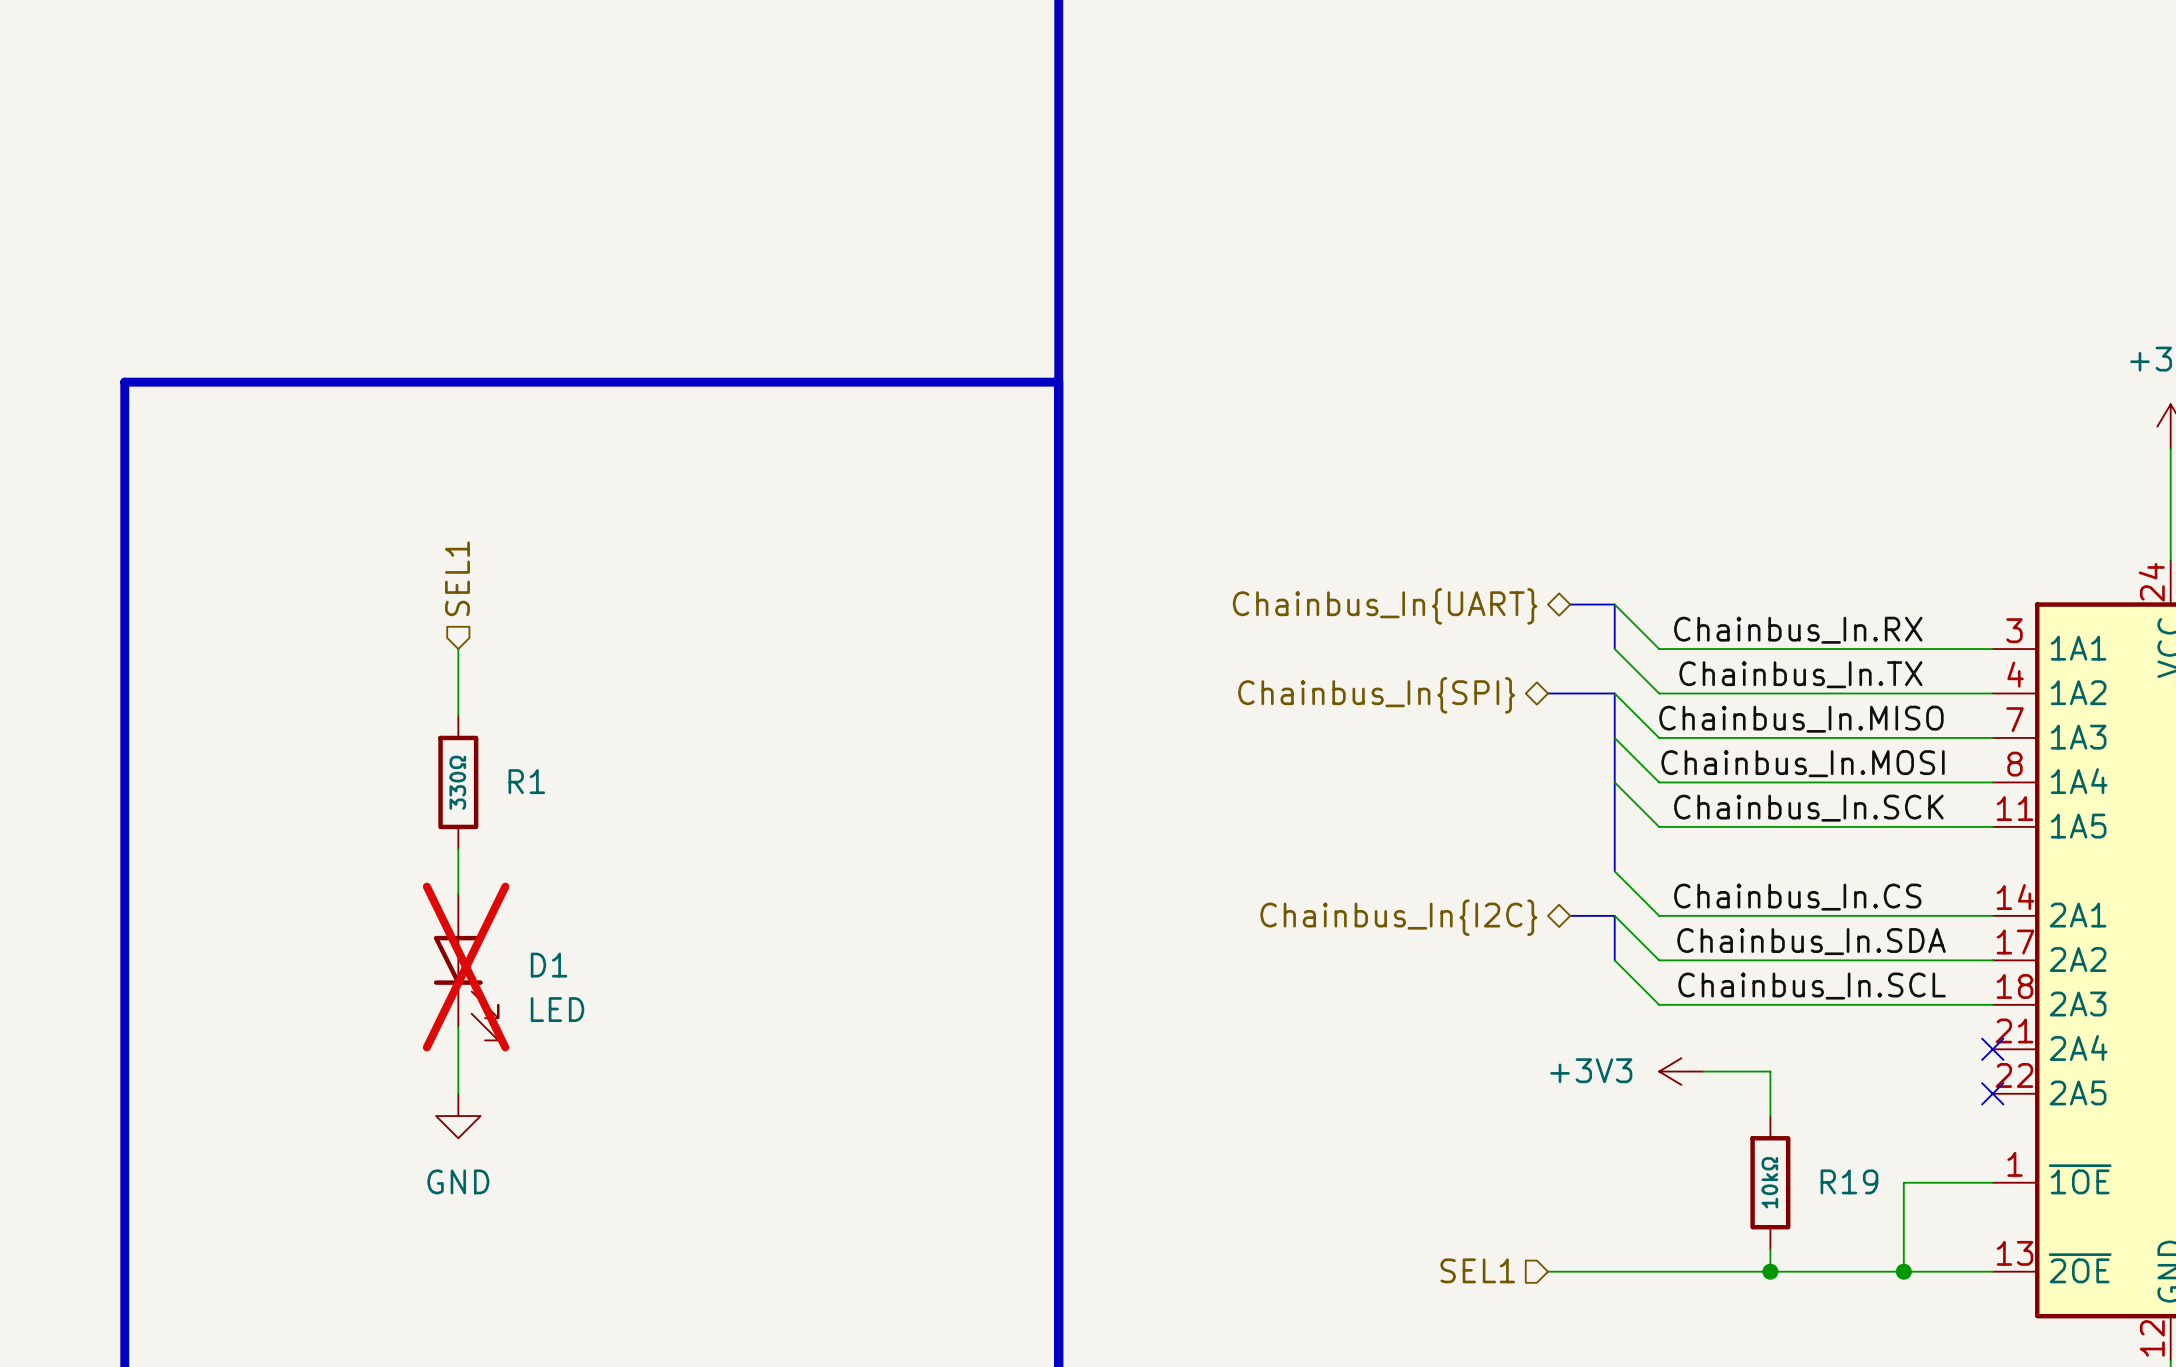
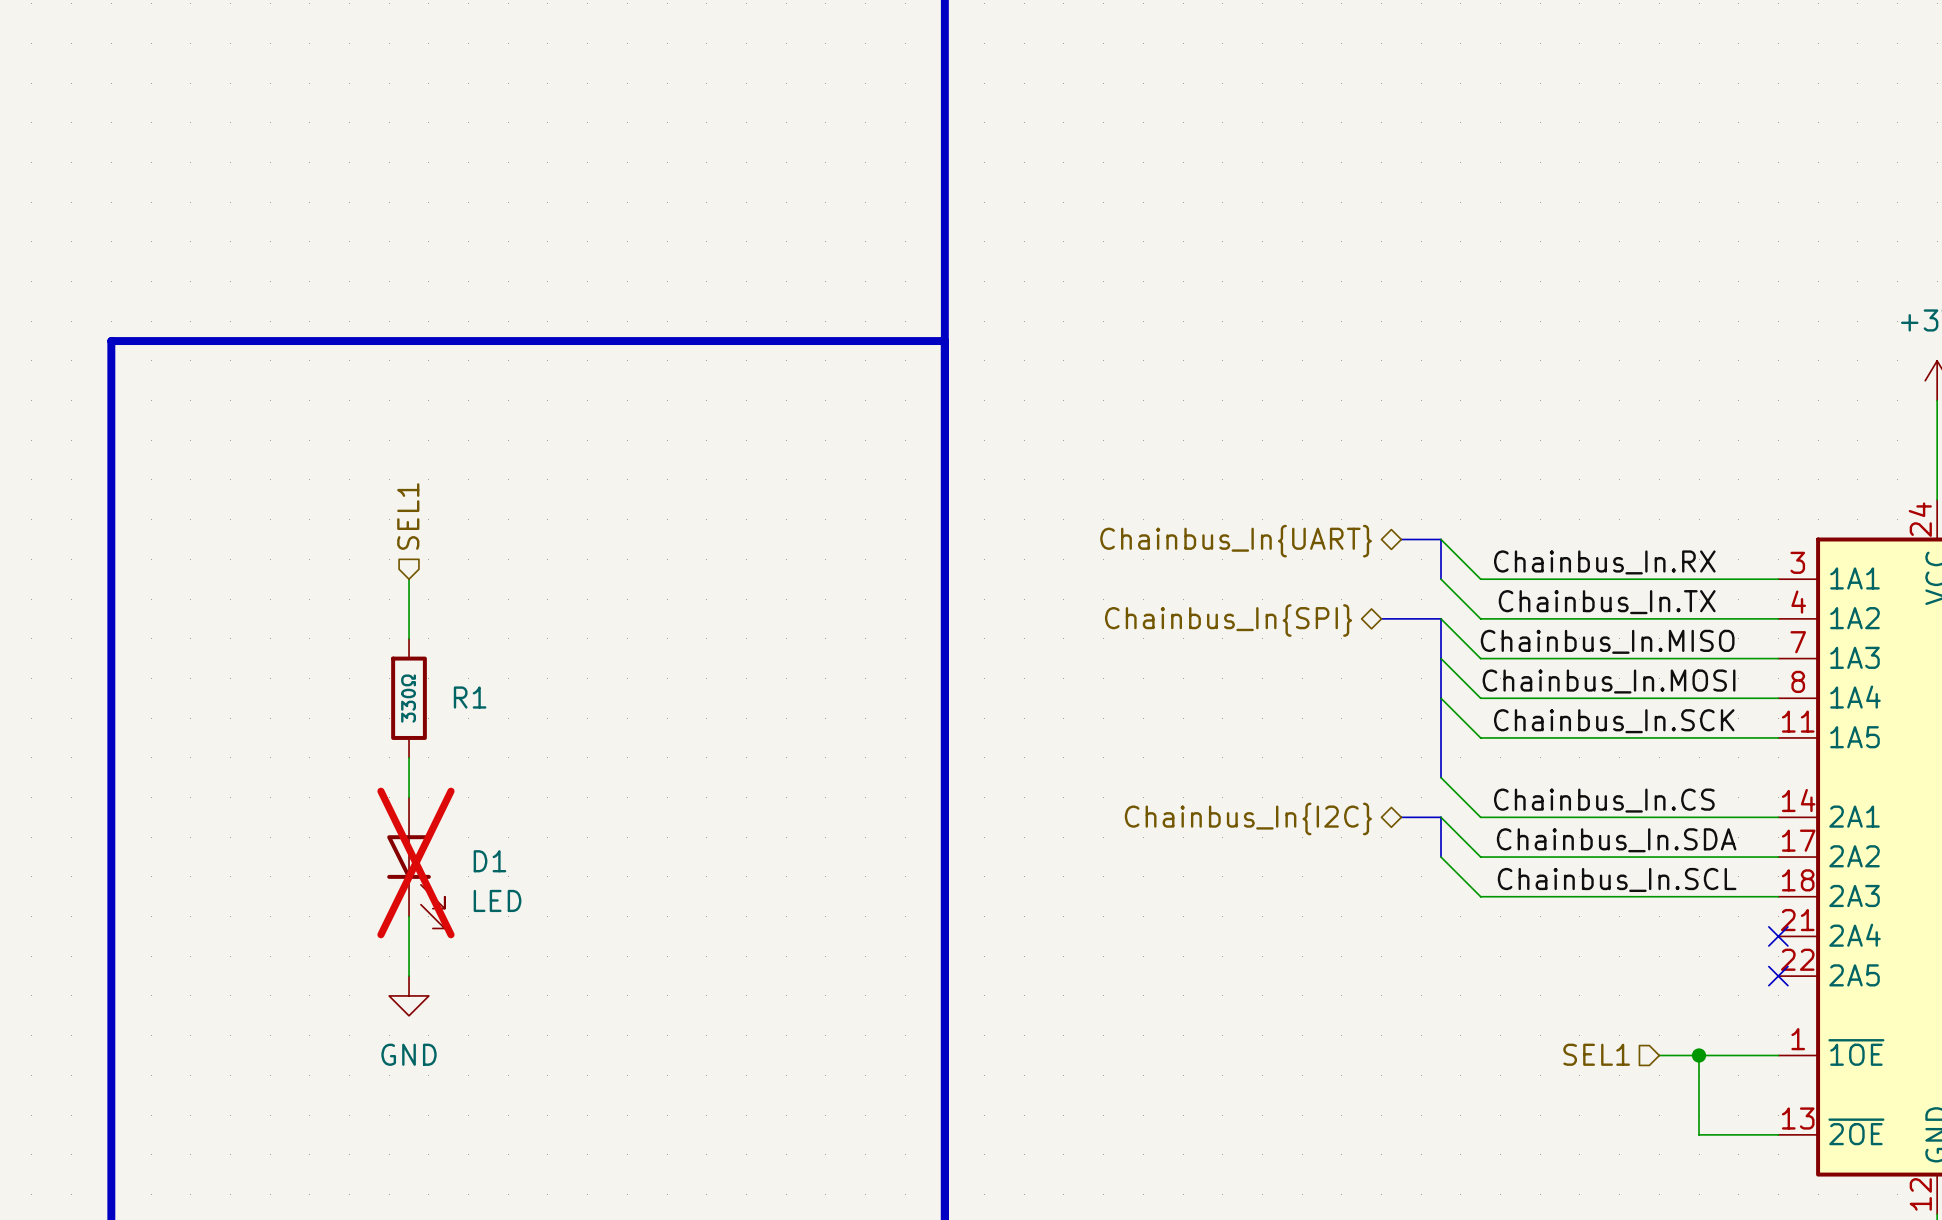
power symbol: +3V3 (1681, 1071) -> none
wire: (1703, 1071) (1770, 1071) (1770, 1116) -> none
R19: 10kΩ (1770, 1182) -> none
wire: none -> (1659, 1055) (1699, 1055)
junction: none -> (1699, 1055)
wire: (1770, 1249) (1770, 1271) -> none
hierarchical label position: SEL1 (1477, 1270) -> SEL1 (1596, 1054)
wire: (1548, 1271) (1903, 1271) -> none
junction: (1770, 1271) -> none
junction: (1903, 1271) -> none

